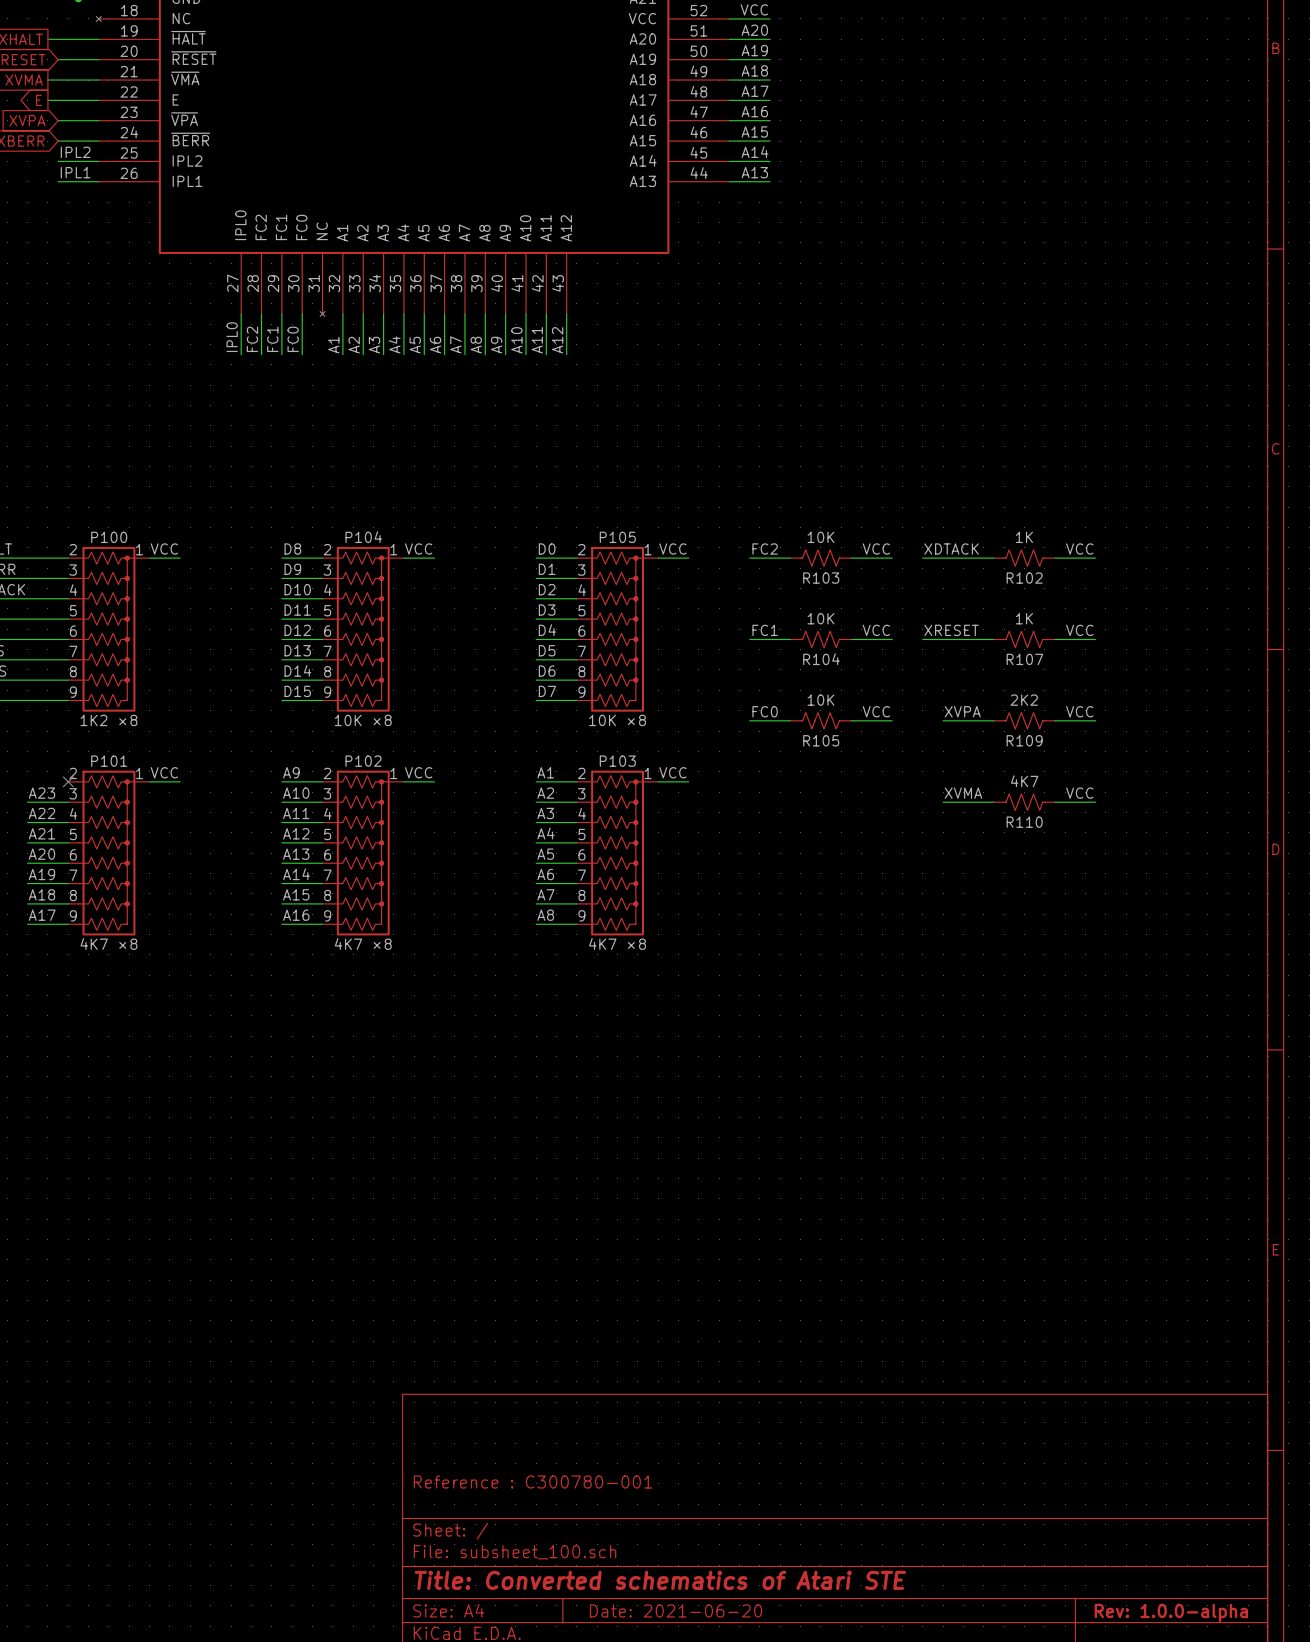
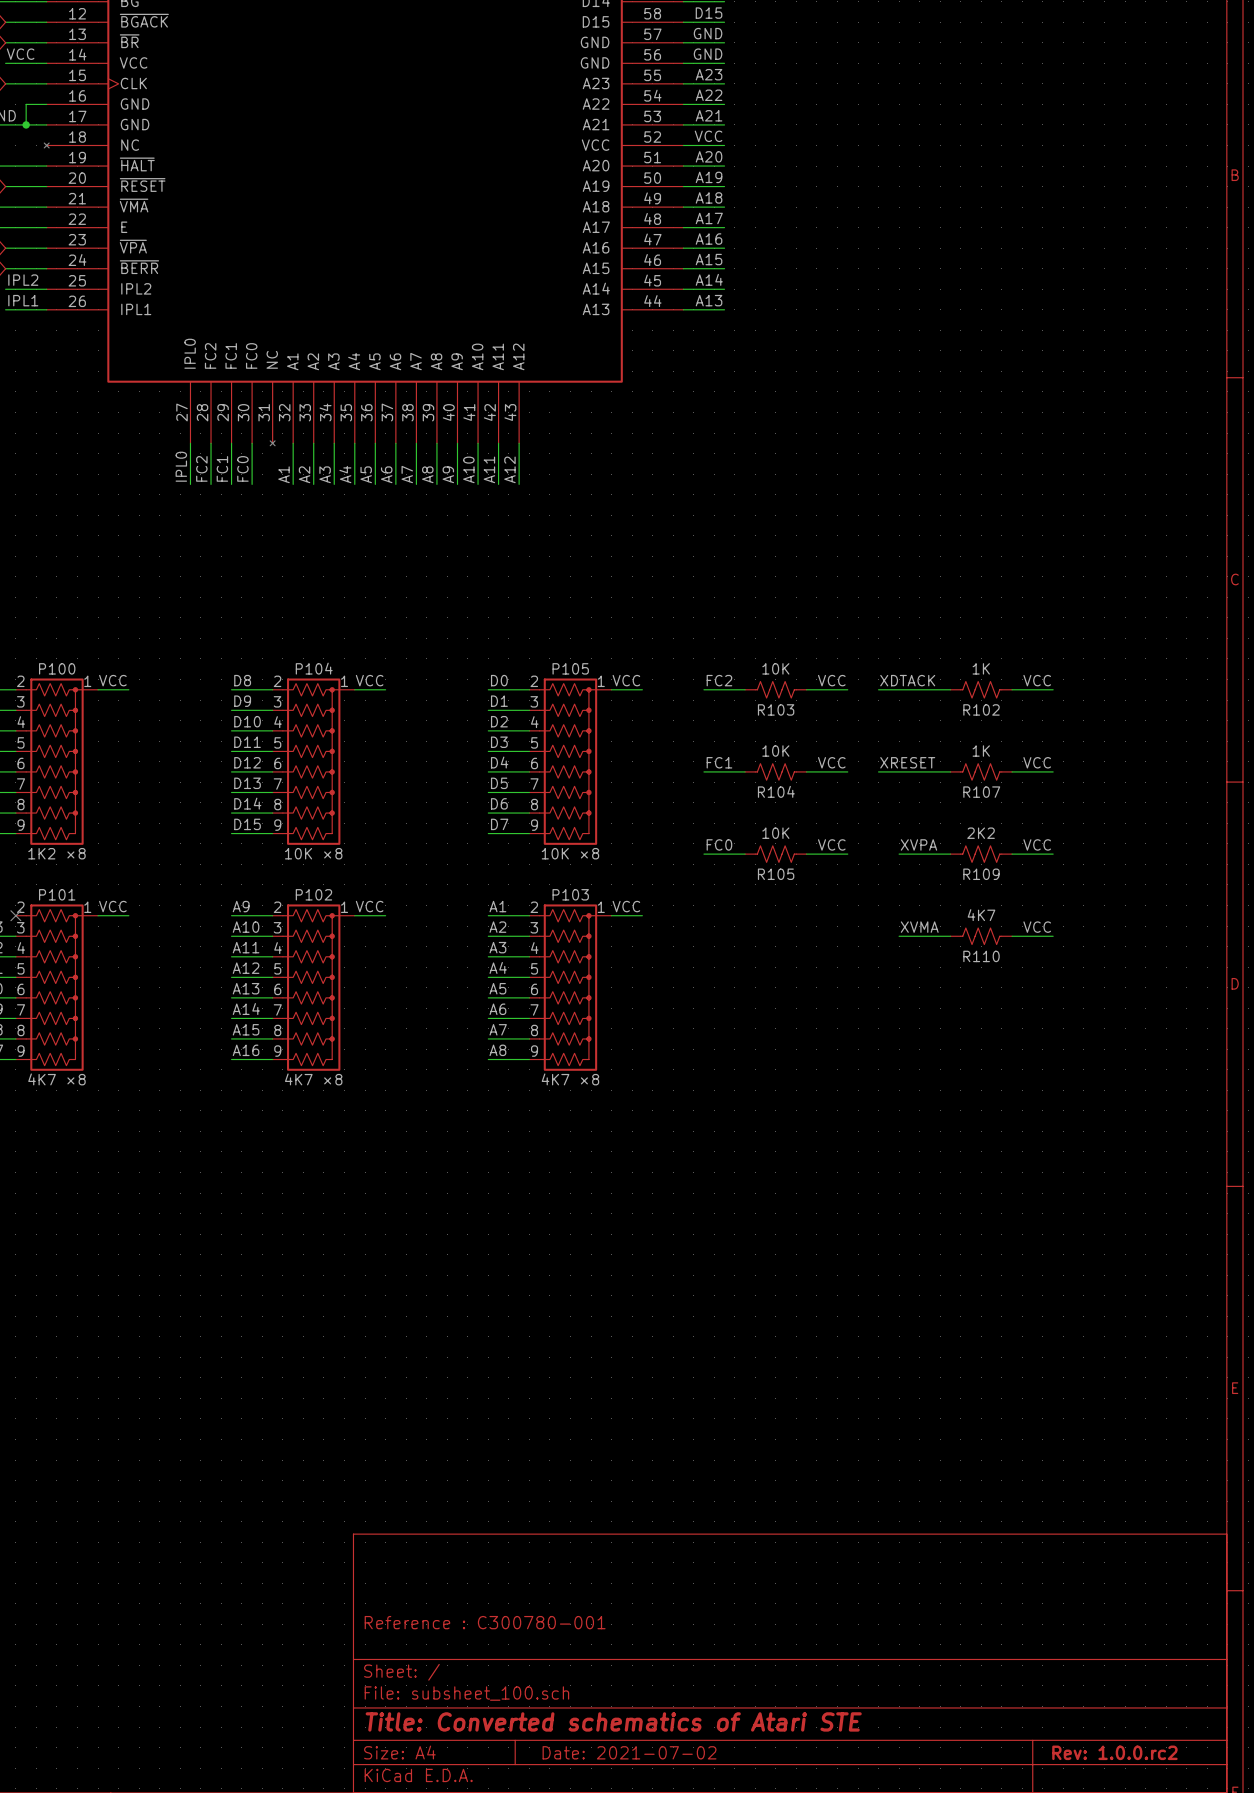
title block: Date: 2021-06-20 (676, 1610) -> Date: 2021-07-02 (629, 1752)
title block: Rev: 1.0.0-alpha (1171, 1612) -> Rev: 1.0.0.rc2 (1114, 1752)

